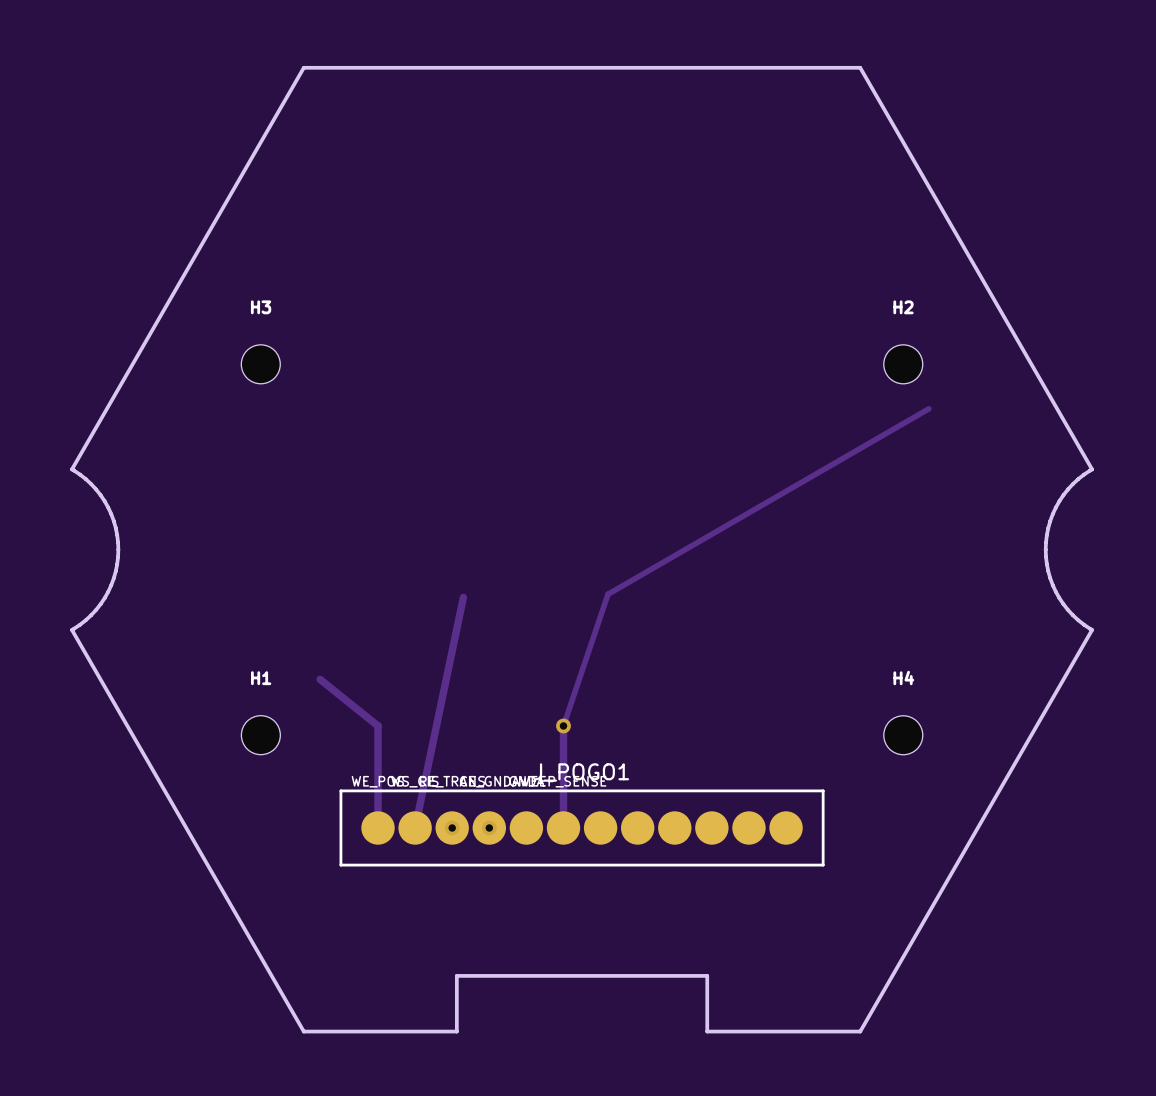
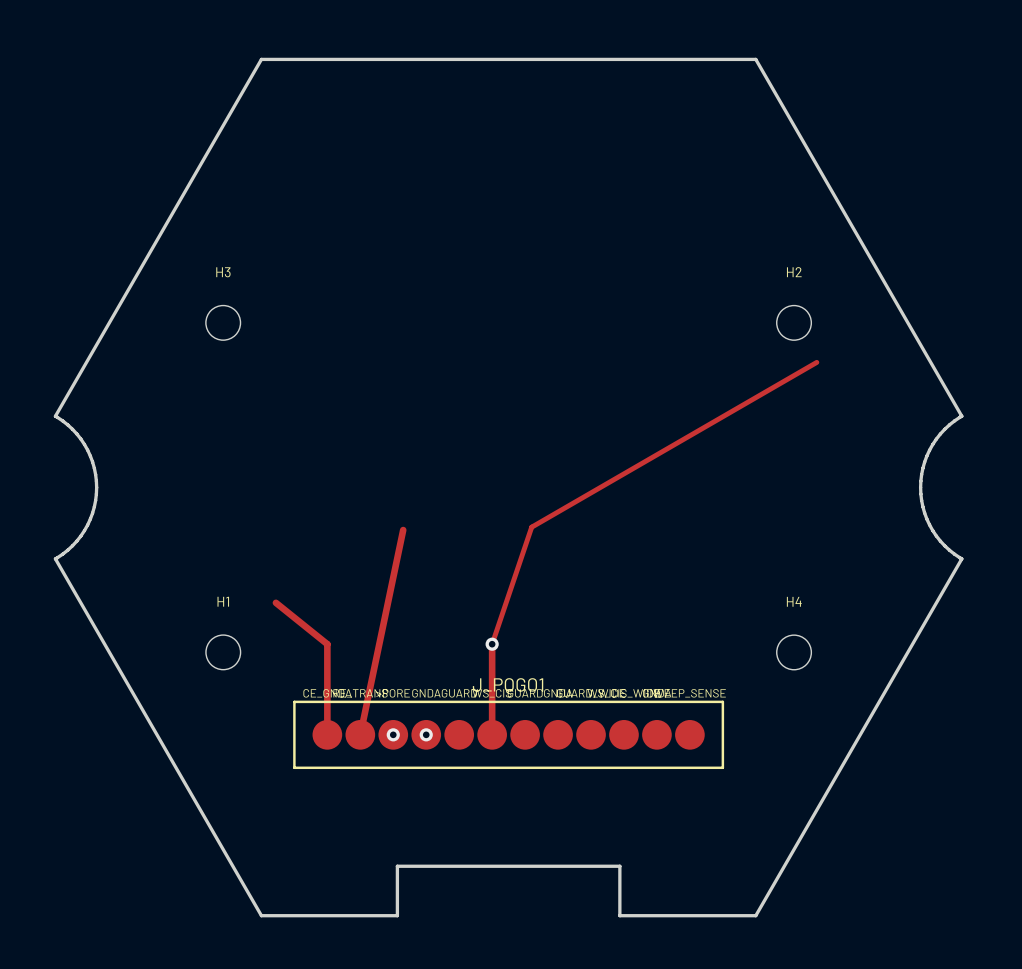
J_POGO1 footprint: [339, 789, 825, 867] -> [293, 700, 725, 770]

